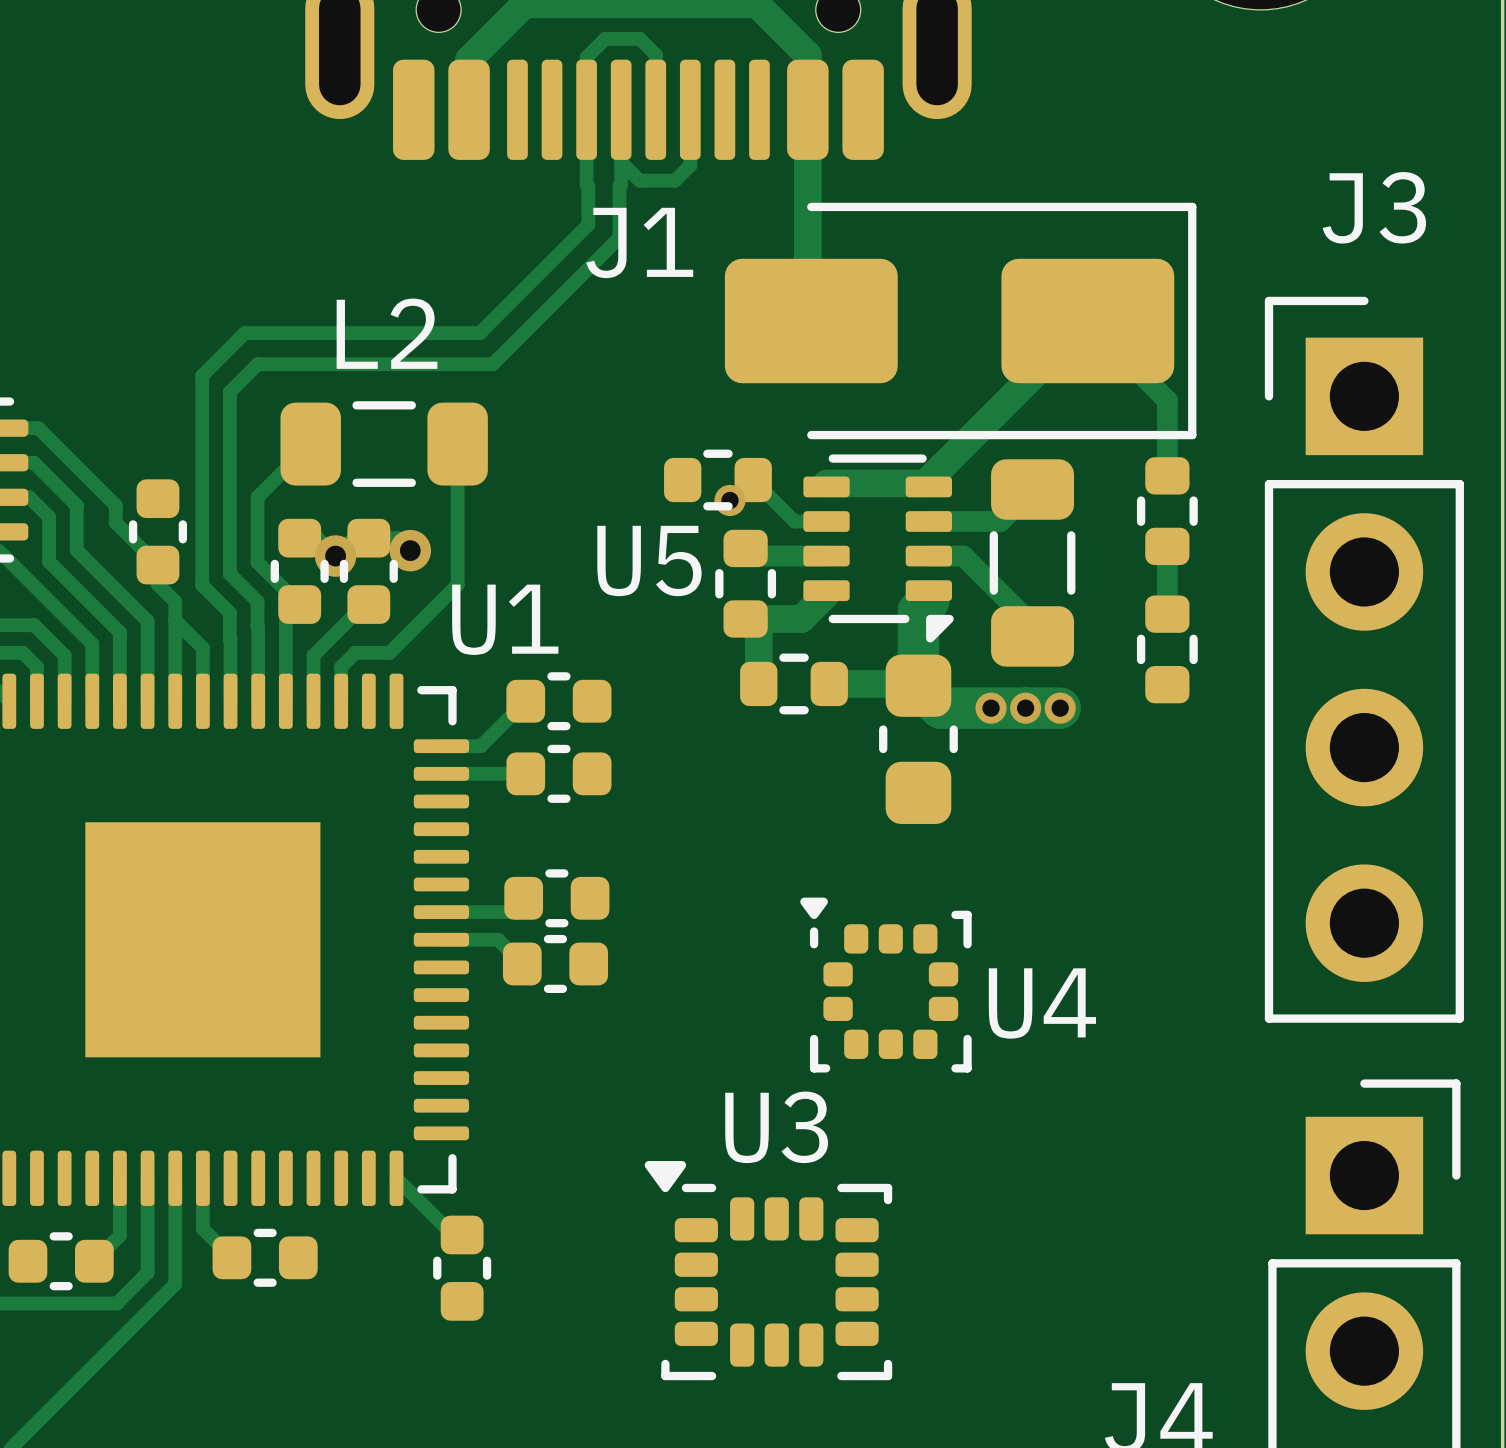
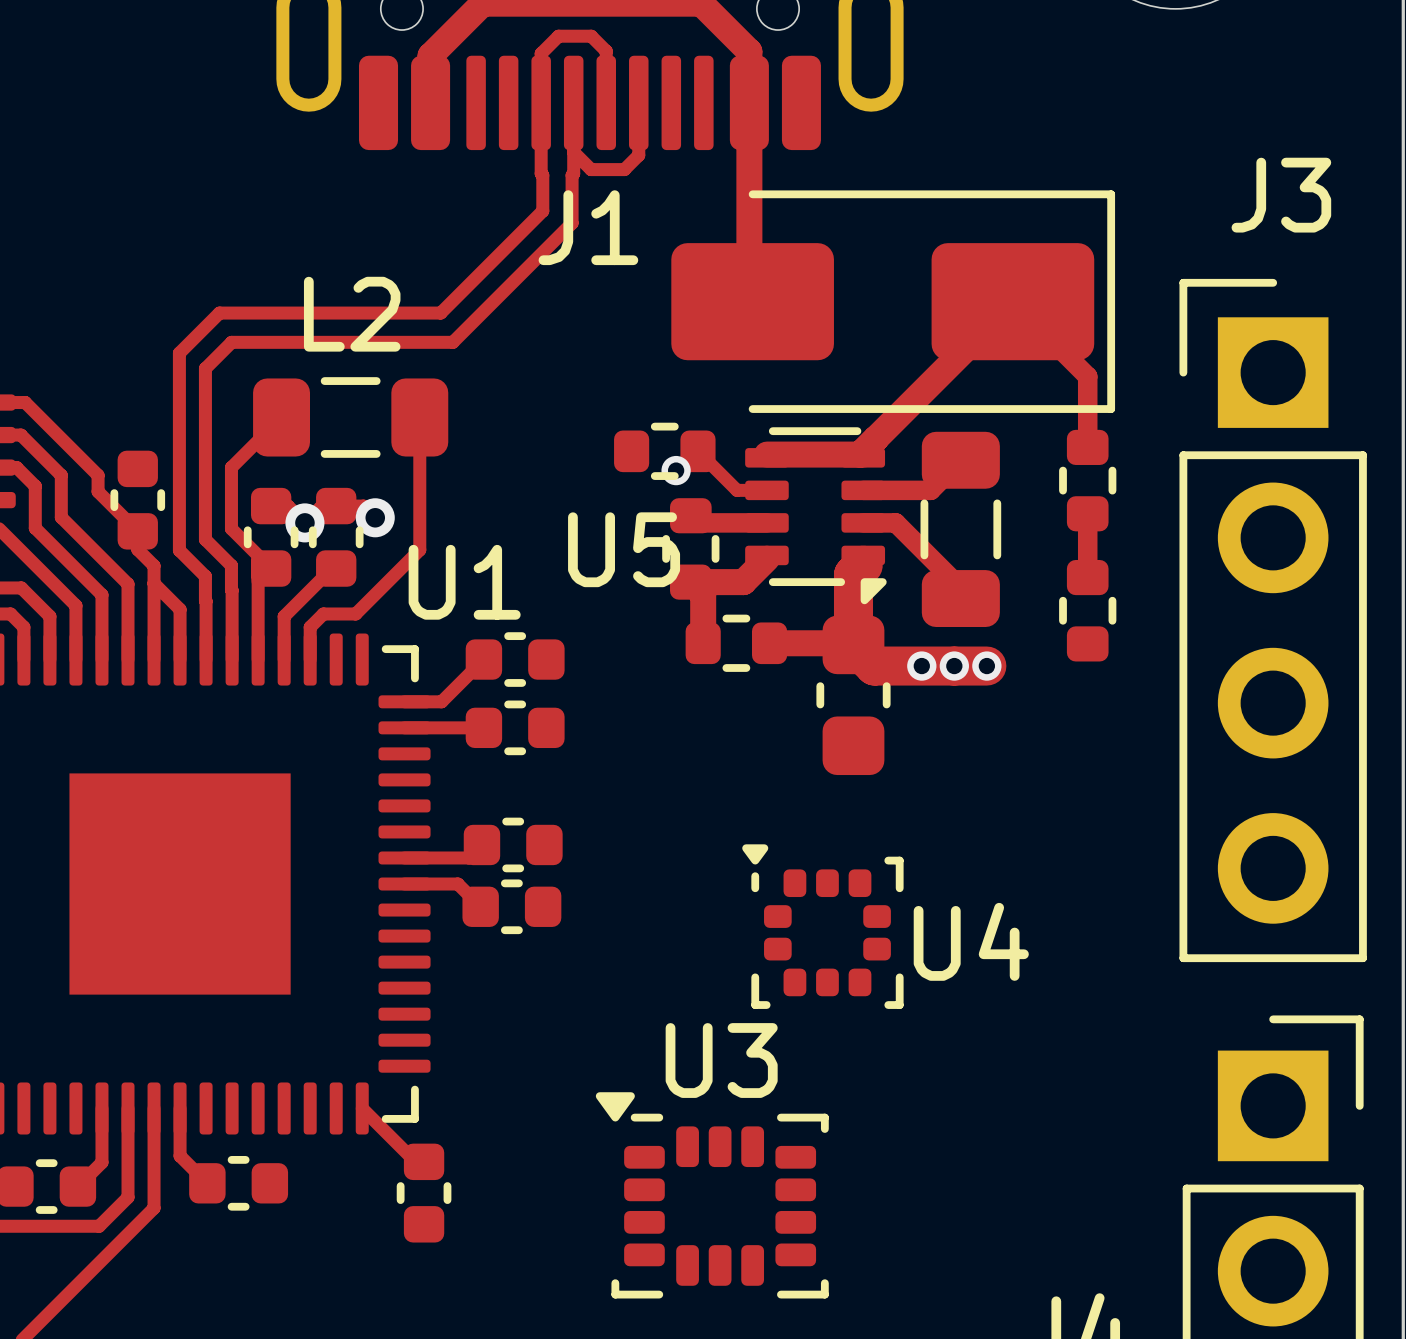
U5 name position: U5 (649, 560) -> U5 (624, 549)

